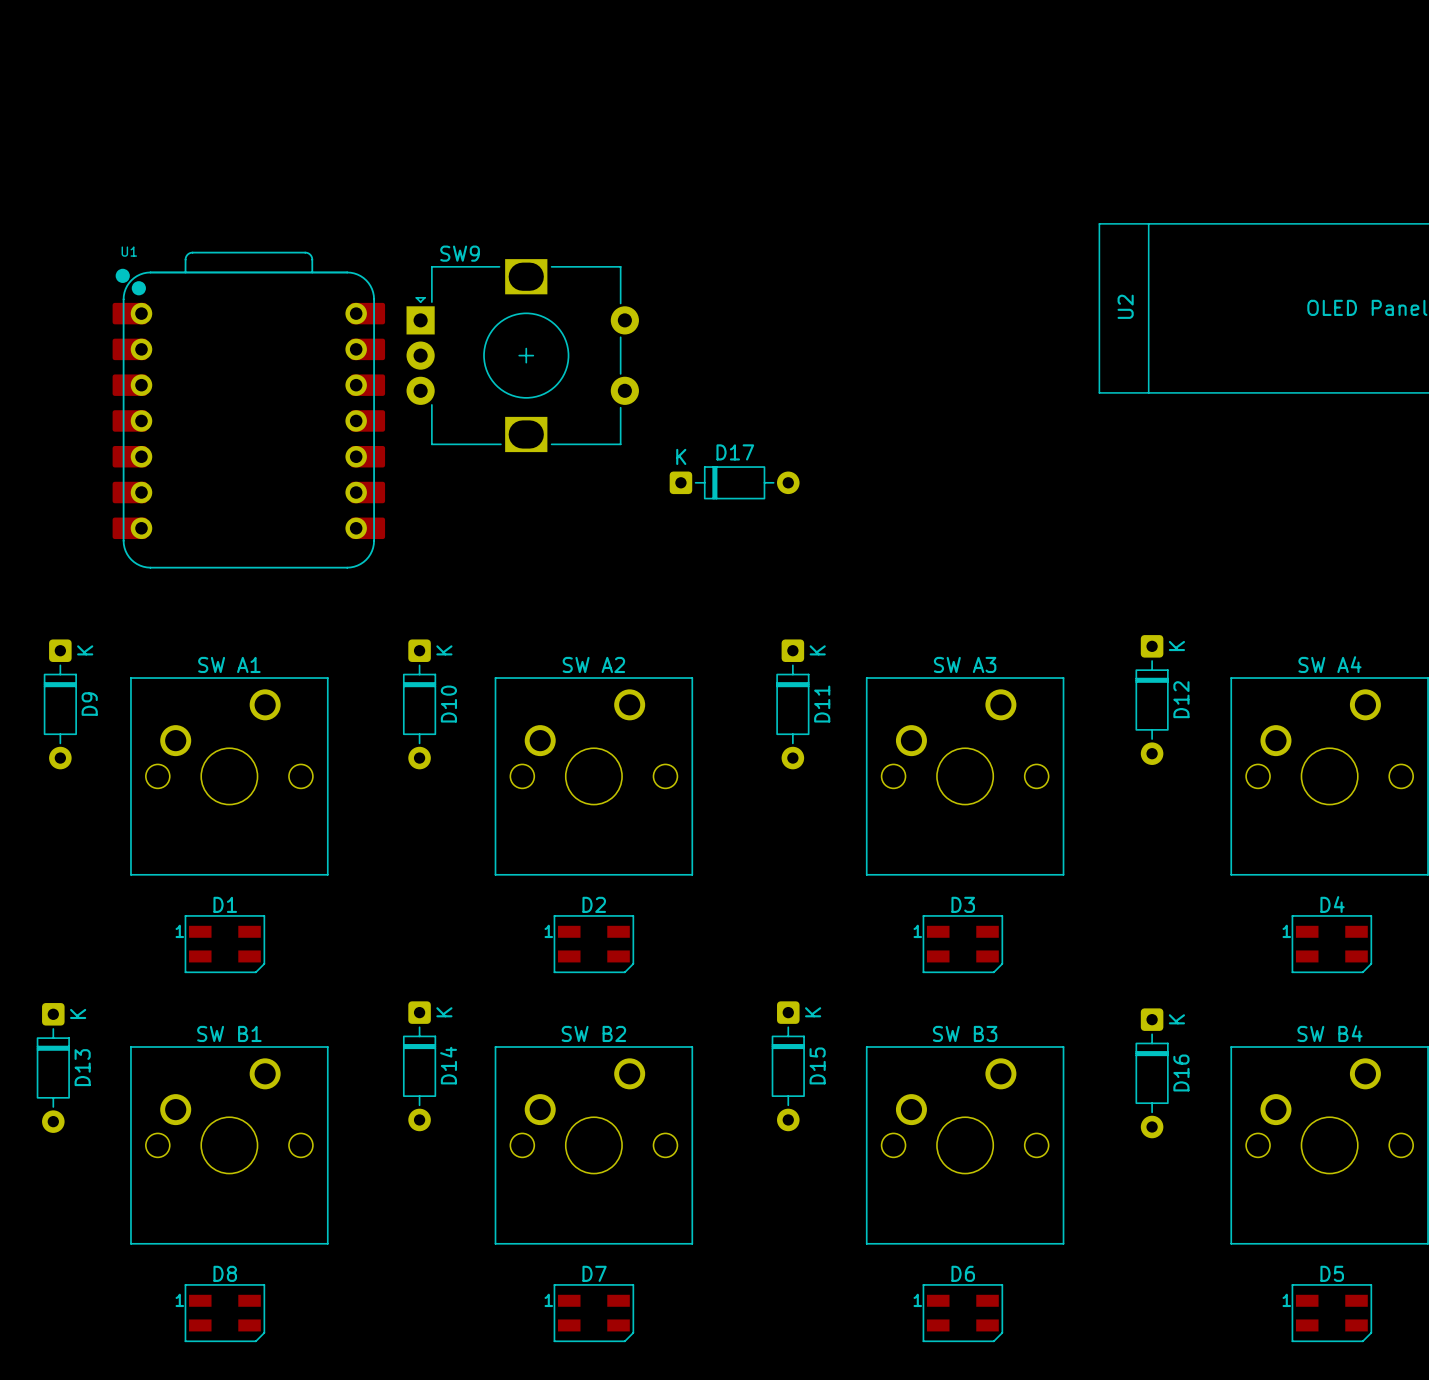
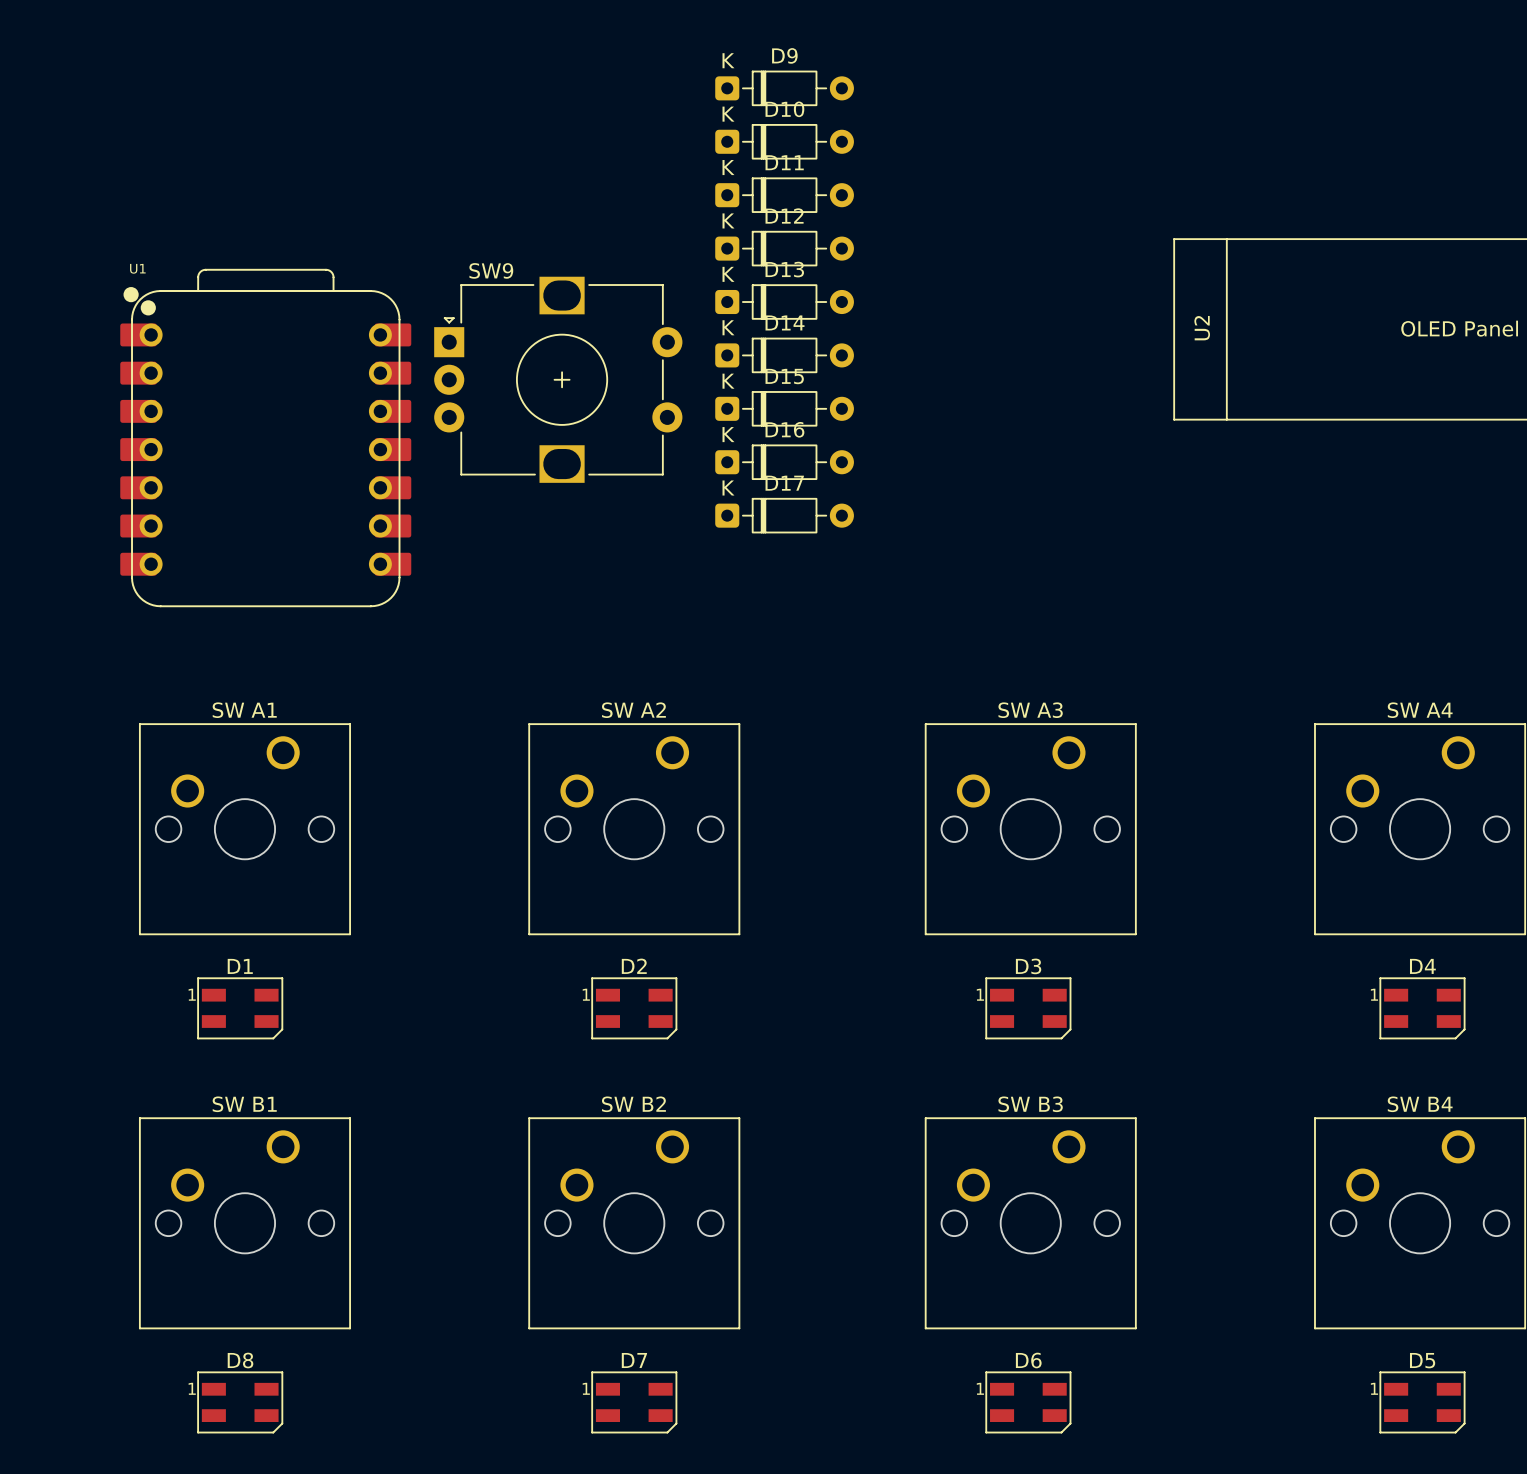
D12 rotation: 0° (1152, 700) -> 90° counterclockwise (784, 248)
D12 position: (1152, 700) -> (784, 248)
D9 rotation: 0° (60, 704) -> 90° counterclockwise (784, 88)
D9 position: (60, 704) -> (784, 88)
D10 rotation: 0° (419, 704) -> 90° counterclockwise (784, 141)
D10 position: (419, 704) -> (784, 141)
D11 rotation: 0° (792, 704) -> 90° counterclockwise (784, 195)
D11 position: (792, 704) -> (784, 195)
D13 footprint: [36, 1003, 70, 1133] -> [715, 284, 854, 320]
D14 rotation: 0° (419, 1066) -> 90° counterclockwise (784, 355)
D14 position: (419, 1066) -> (784, 355)
D15 rotation: 0° (788, 1066) -> 90° counterclockwise (784, 408)
D15 position: (788, 1066) -> (784, 408)
D13 name position: D13 (82, 1067) -> D13 (784, 269)
D16 rotation: 0° (1152, 1073) -> 90° counterclockwise (784, 462)
D16 position: (1152, 1073) -> (784, 462)

